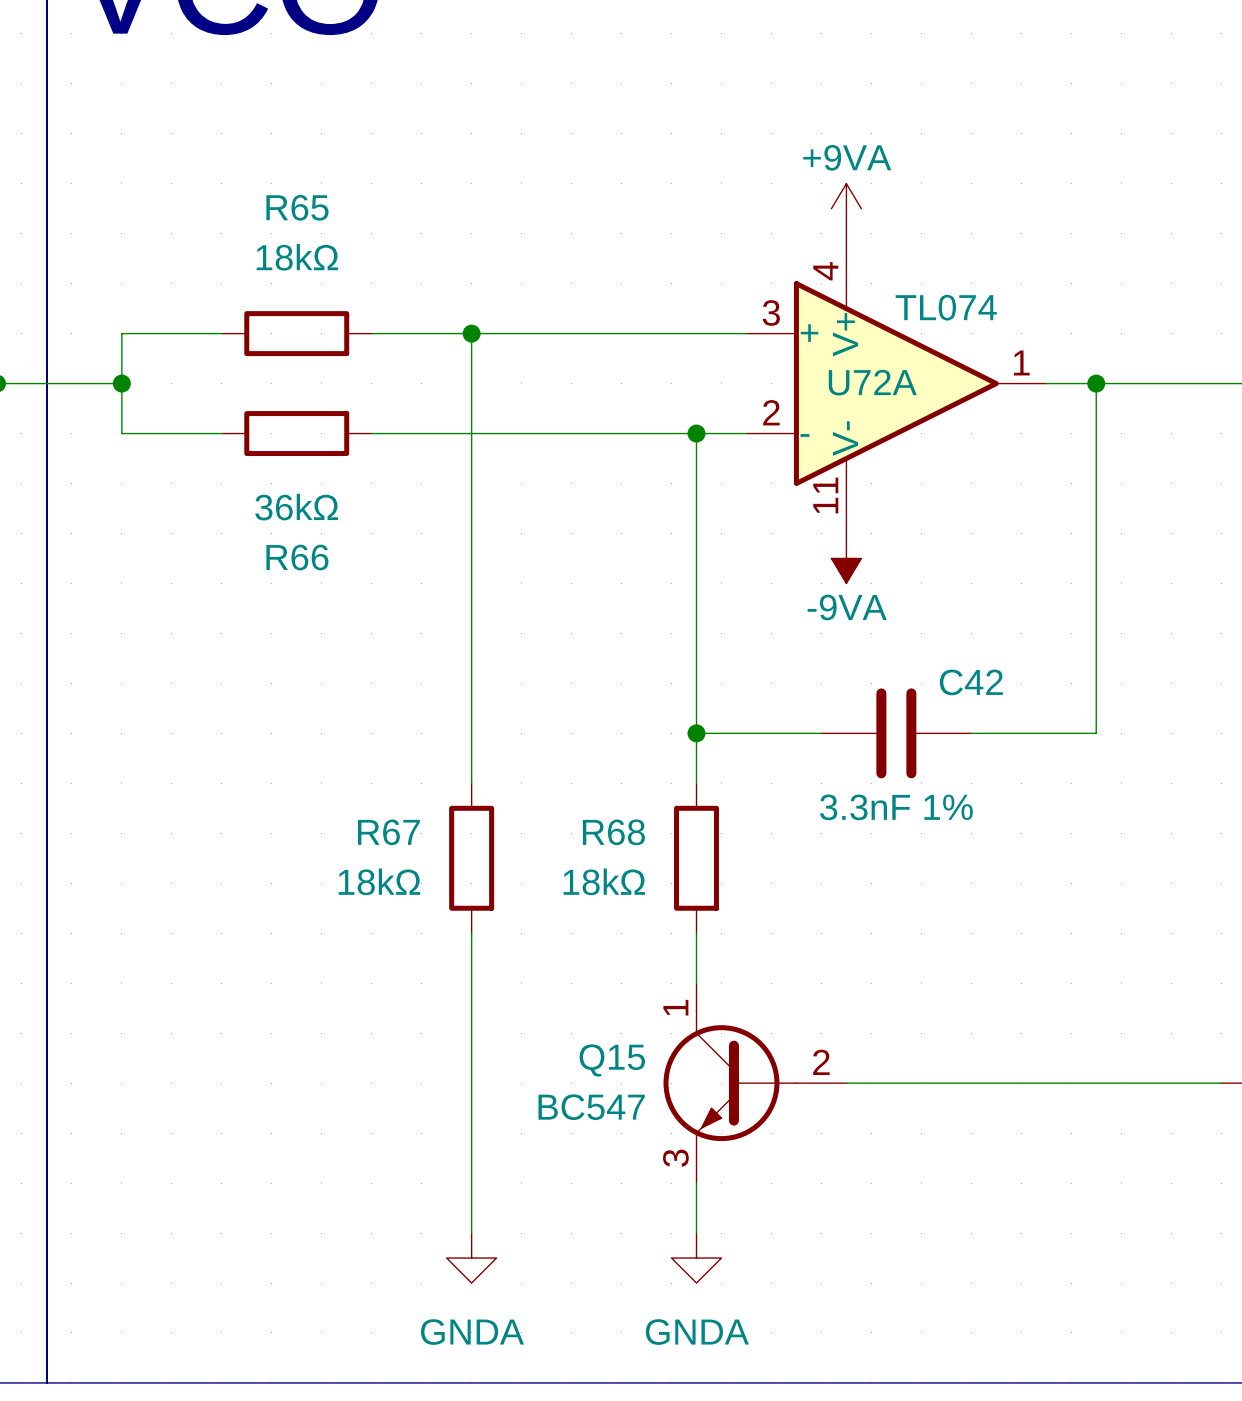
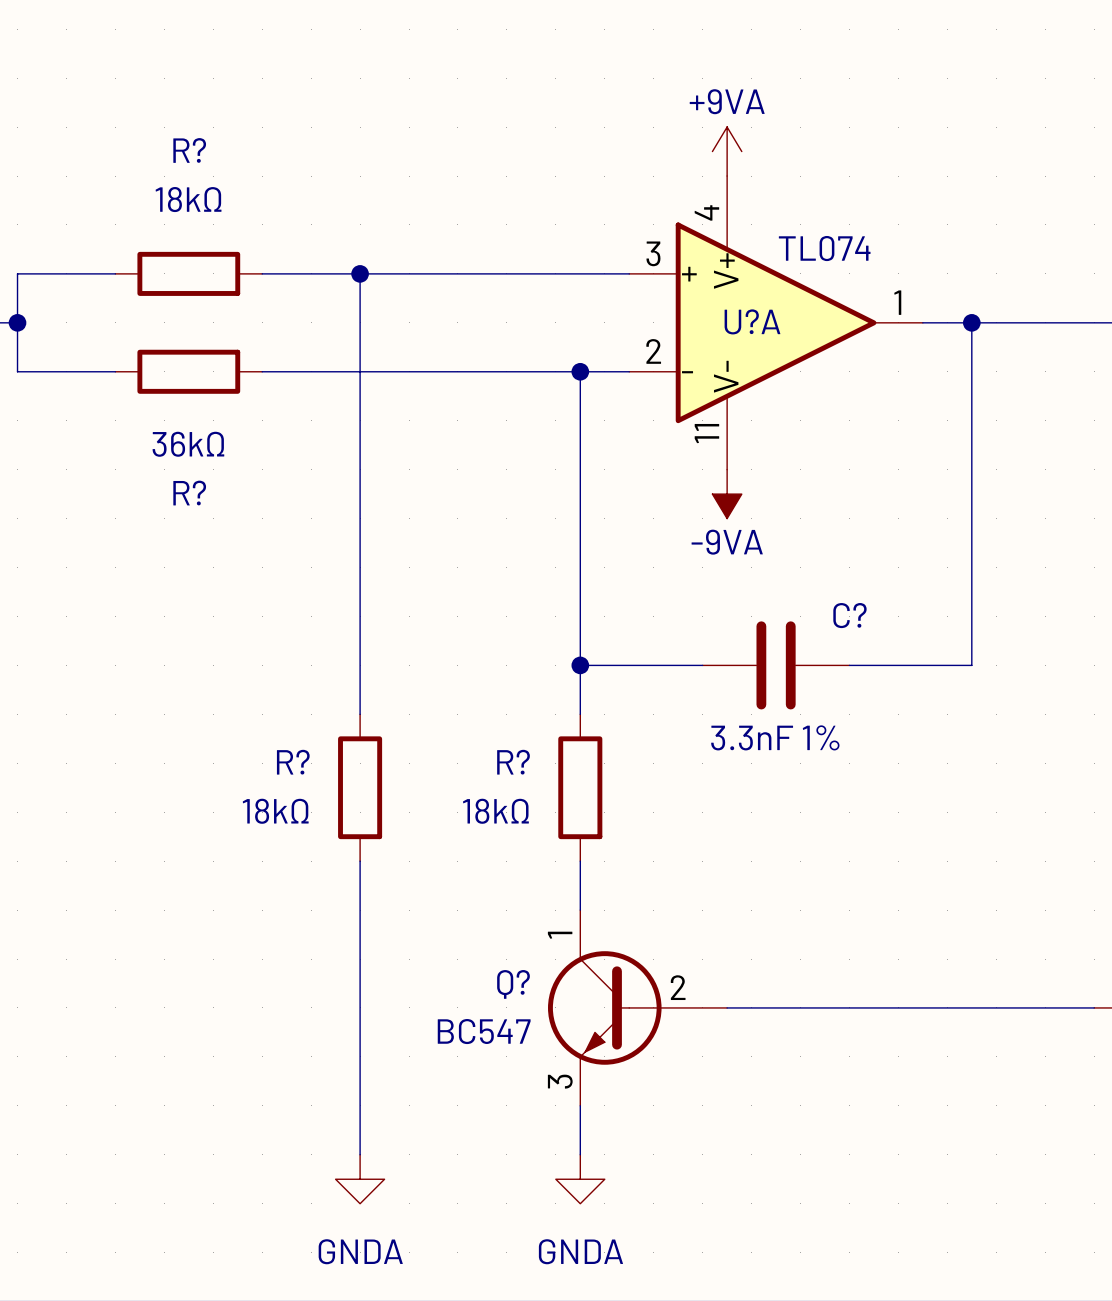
R65 name: R65 (297, 207) -> R? (189, 150)
U72A name: U72A (872, 382) -> U?A (752, 321)
R66 name: R66 (297, 557) -> R? (189, 493)
C42 name: C42 (971, 682) -> C? (849, 615)
R67 name: R67 (388, 832) -> R? (293, 762)
R68 name: R68 (613, 832) -> R? (513, 762)
Q15: BC547 (754, 1083) -> none
Q?: none -> BC547 (637, 1007)

